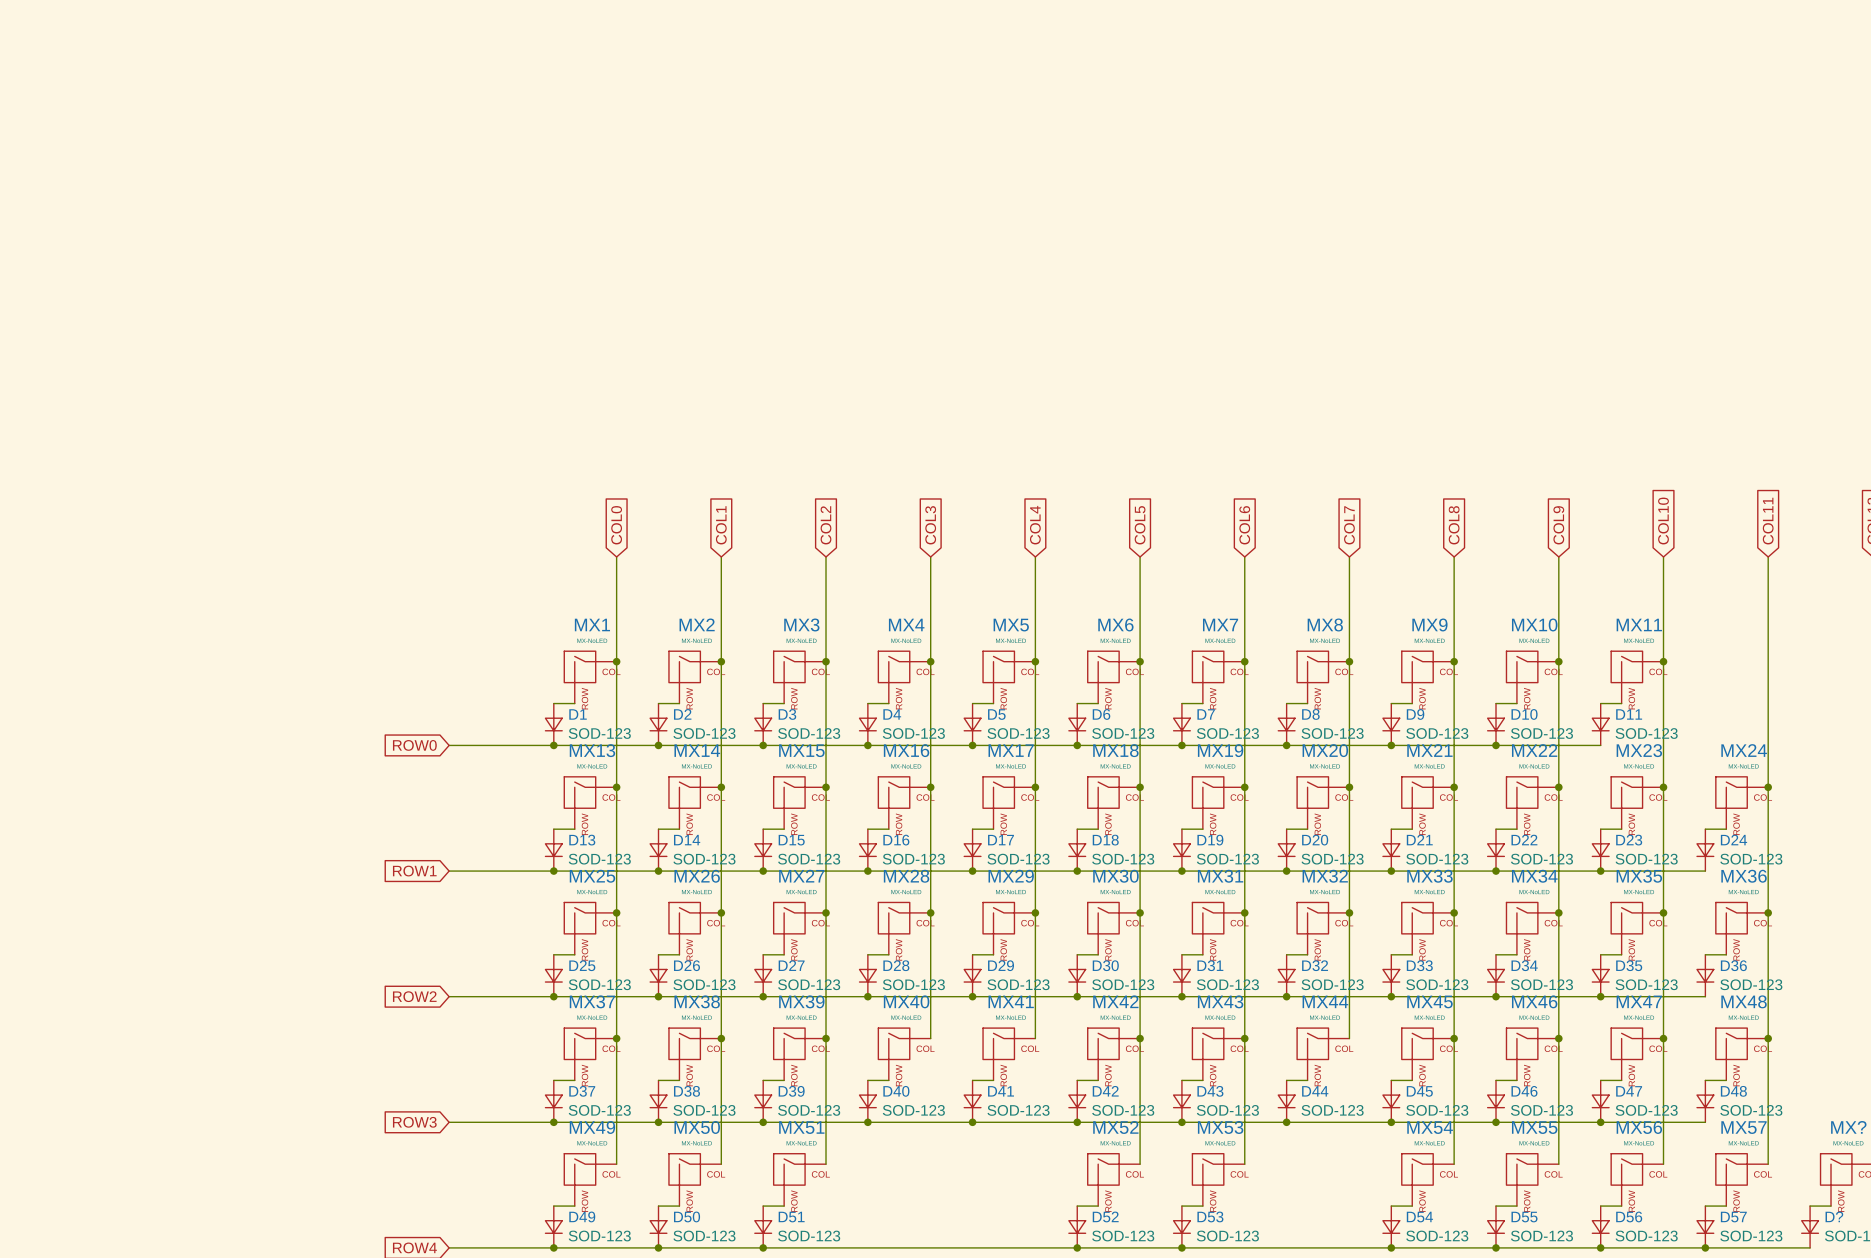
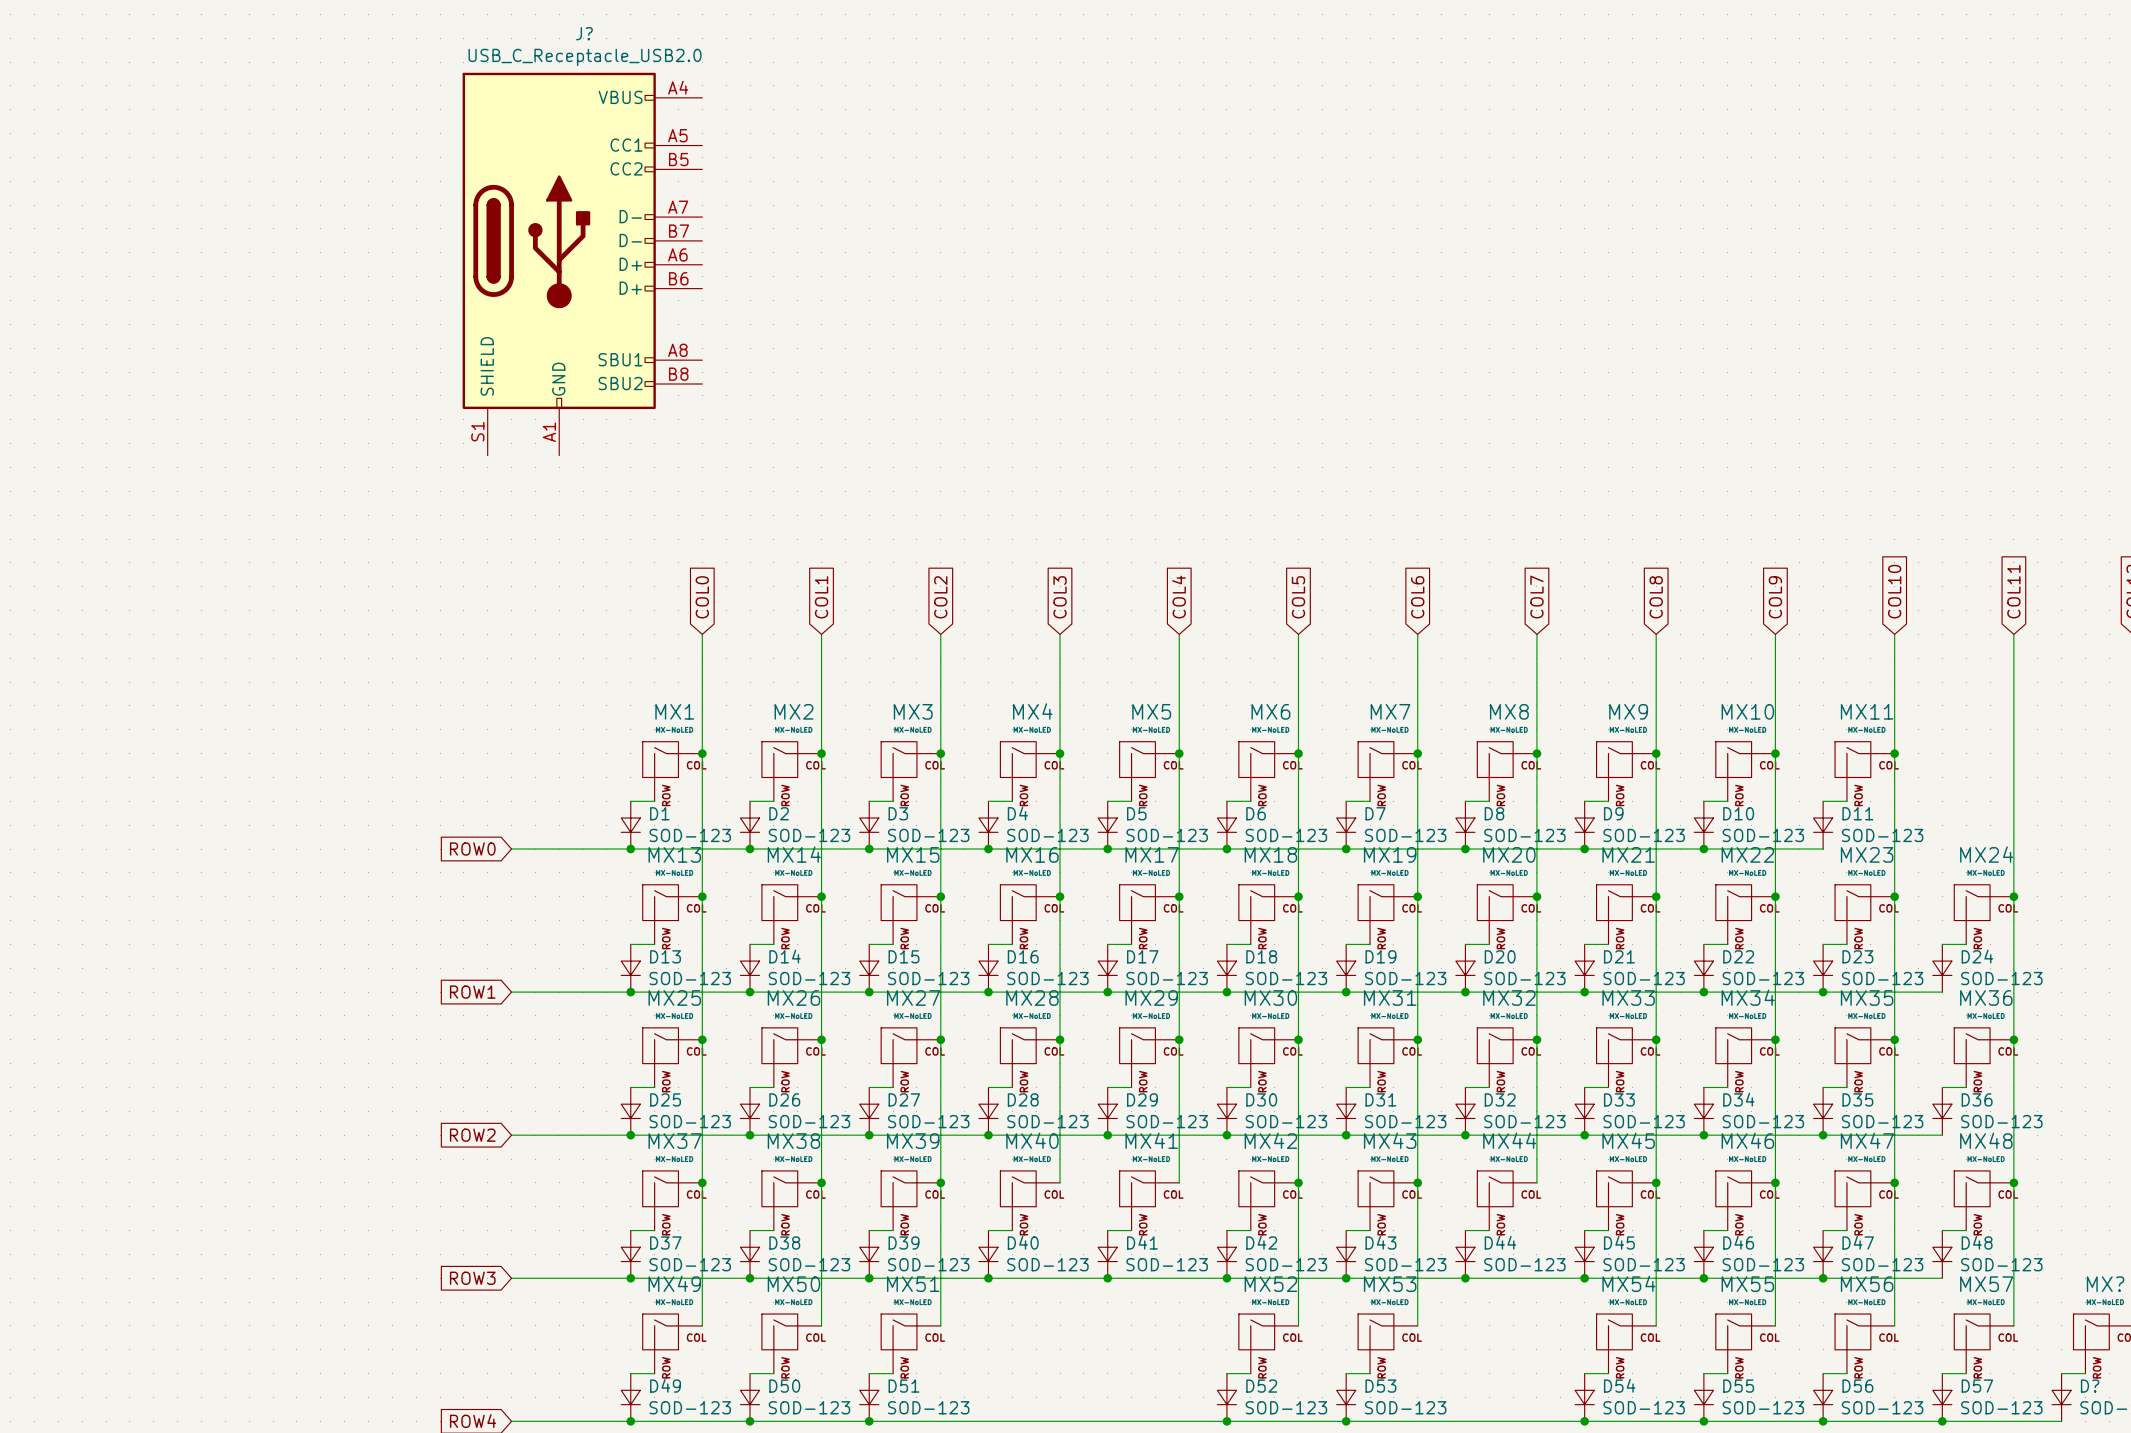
J?: none -> USB_C_Receptacle_USB2.0 (582, 264)

